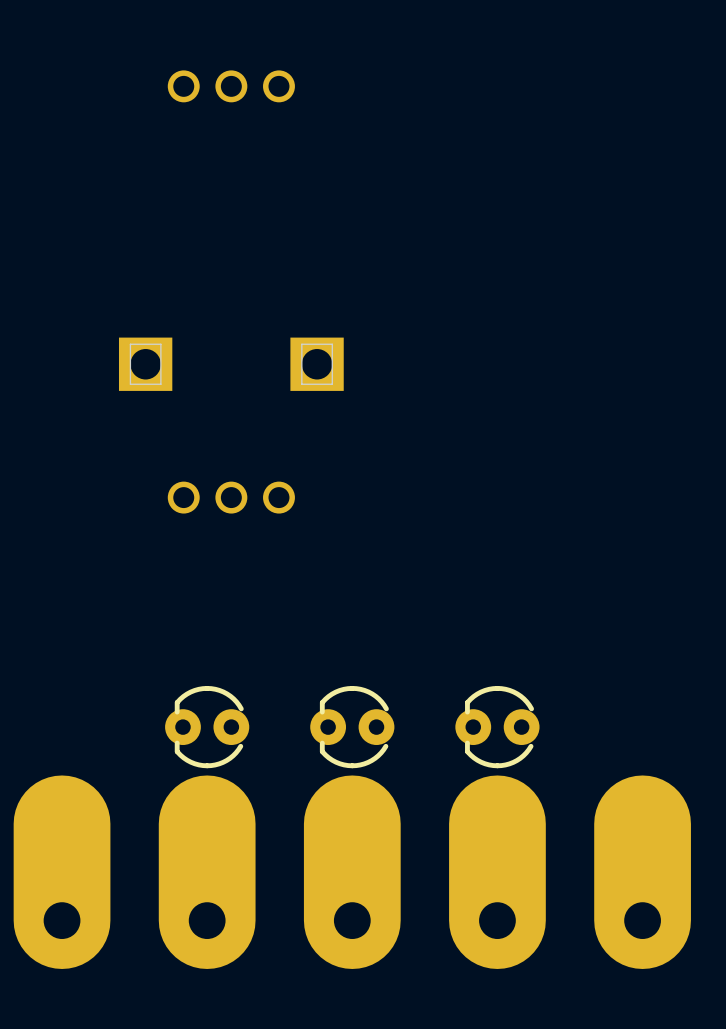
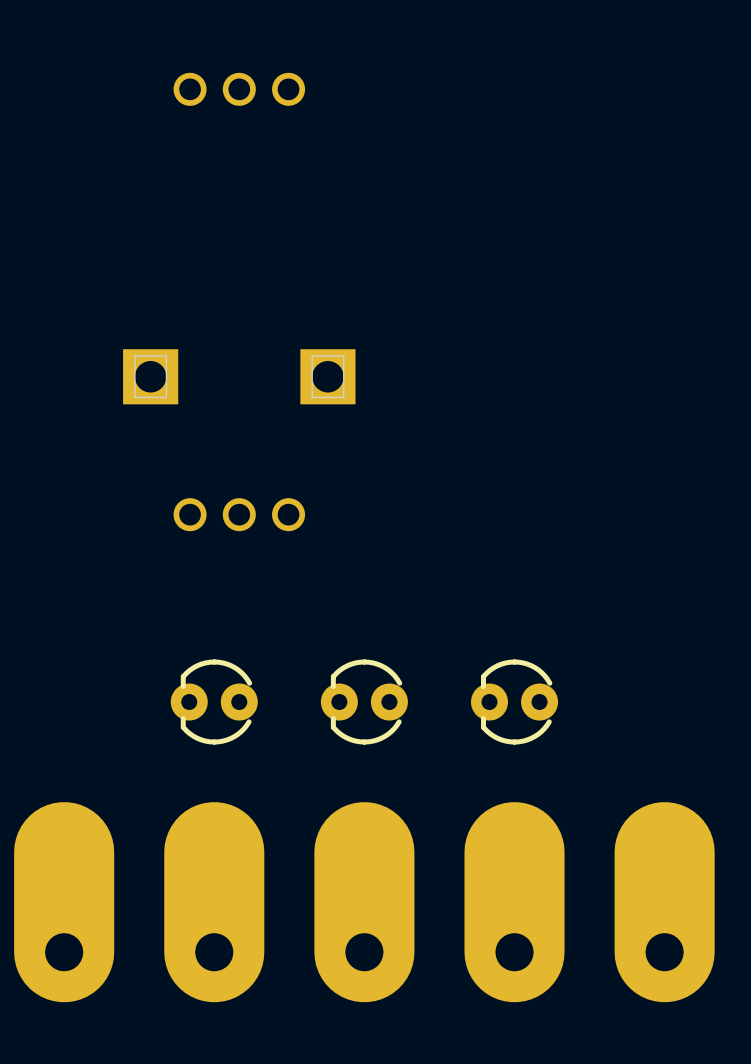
part position: (207, 727) -> (214, 702)
part position: (352, 727) -> (364, 702)
part position: (497, 727) -> (514, 702)

